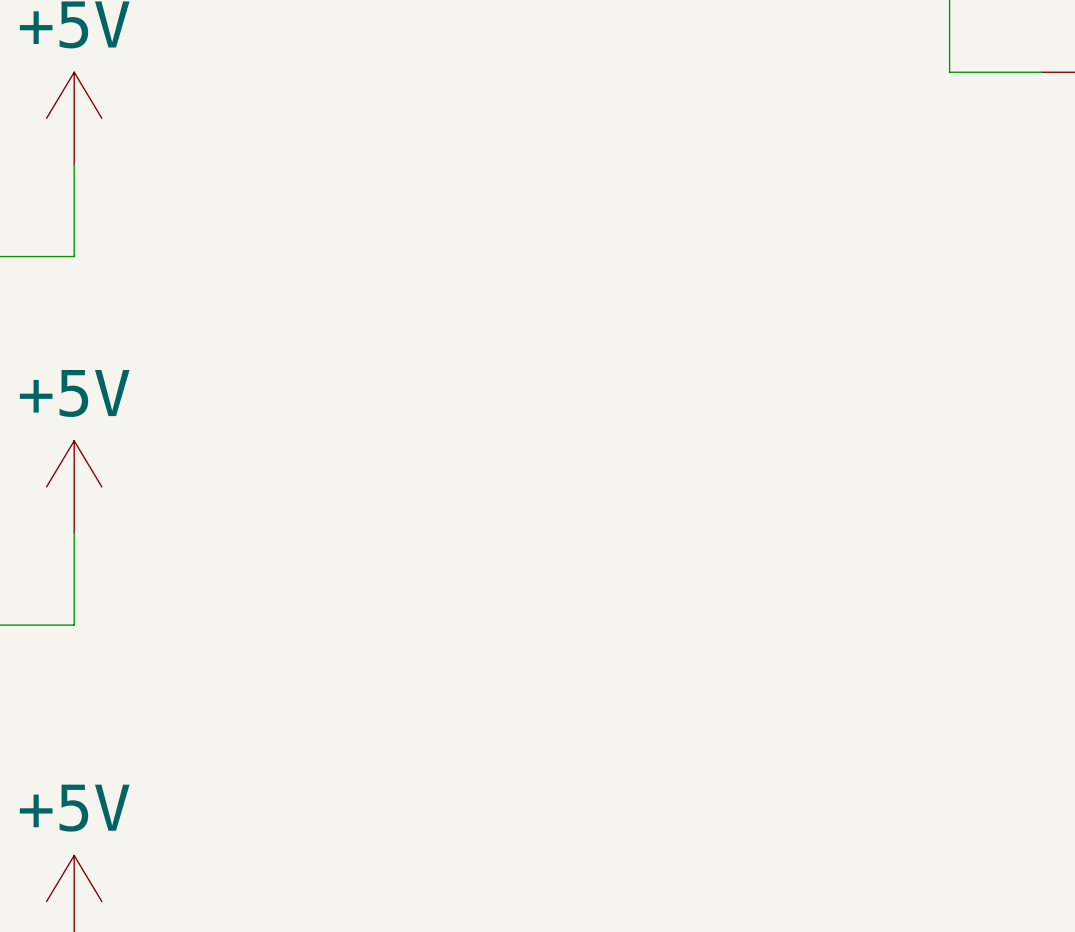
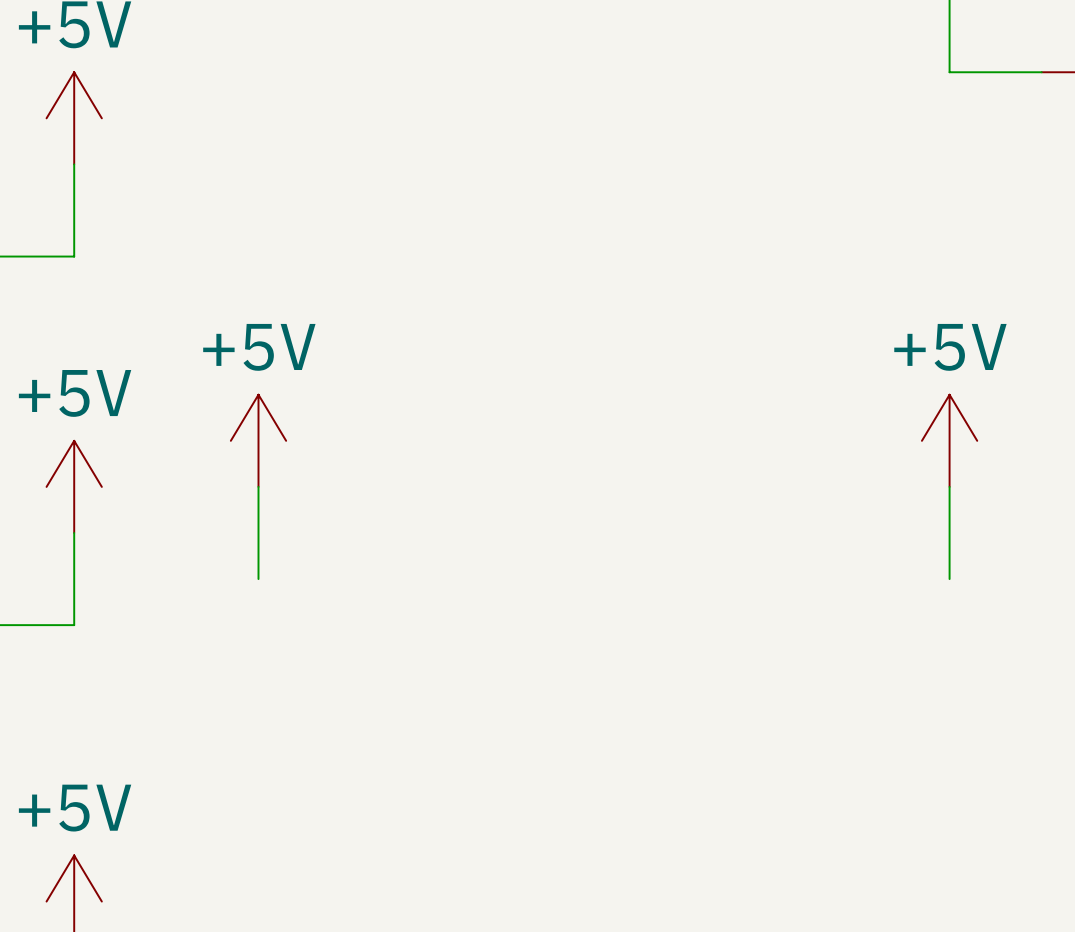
power symbol: none -> +5V (258, 440)
power symbol: none -> +5V (949, 440)
wire: none -> (258, 486) (258, 579)
wire: none -> (949, 486) (949, 579)

